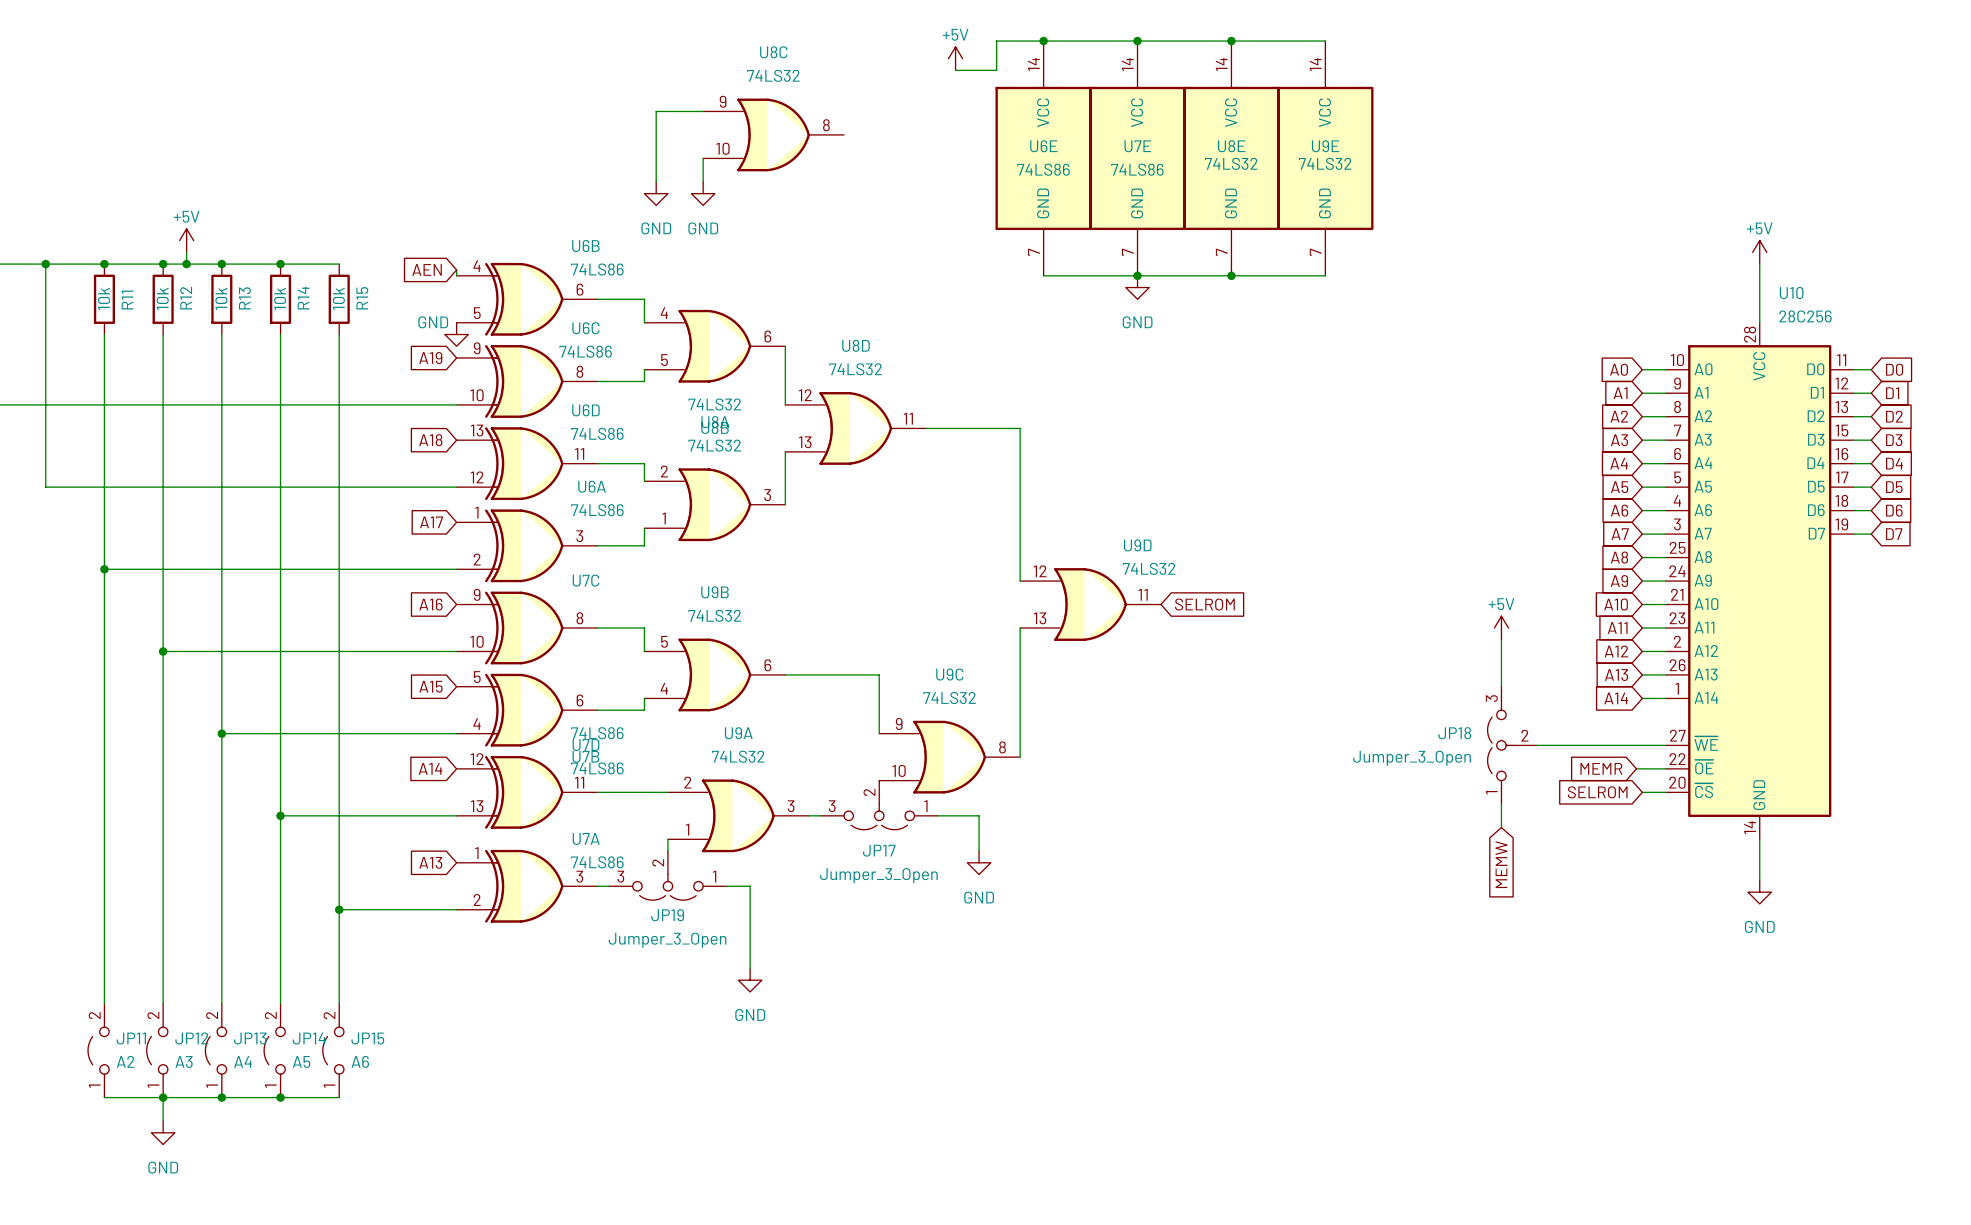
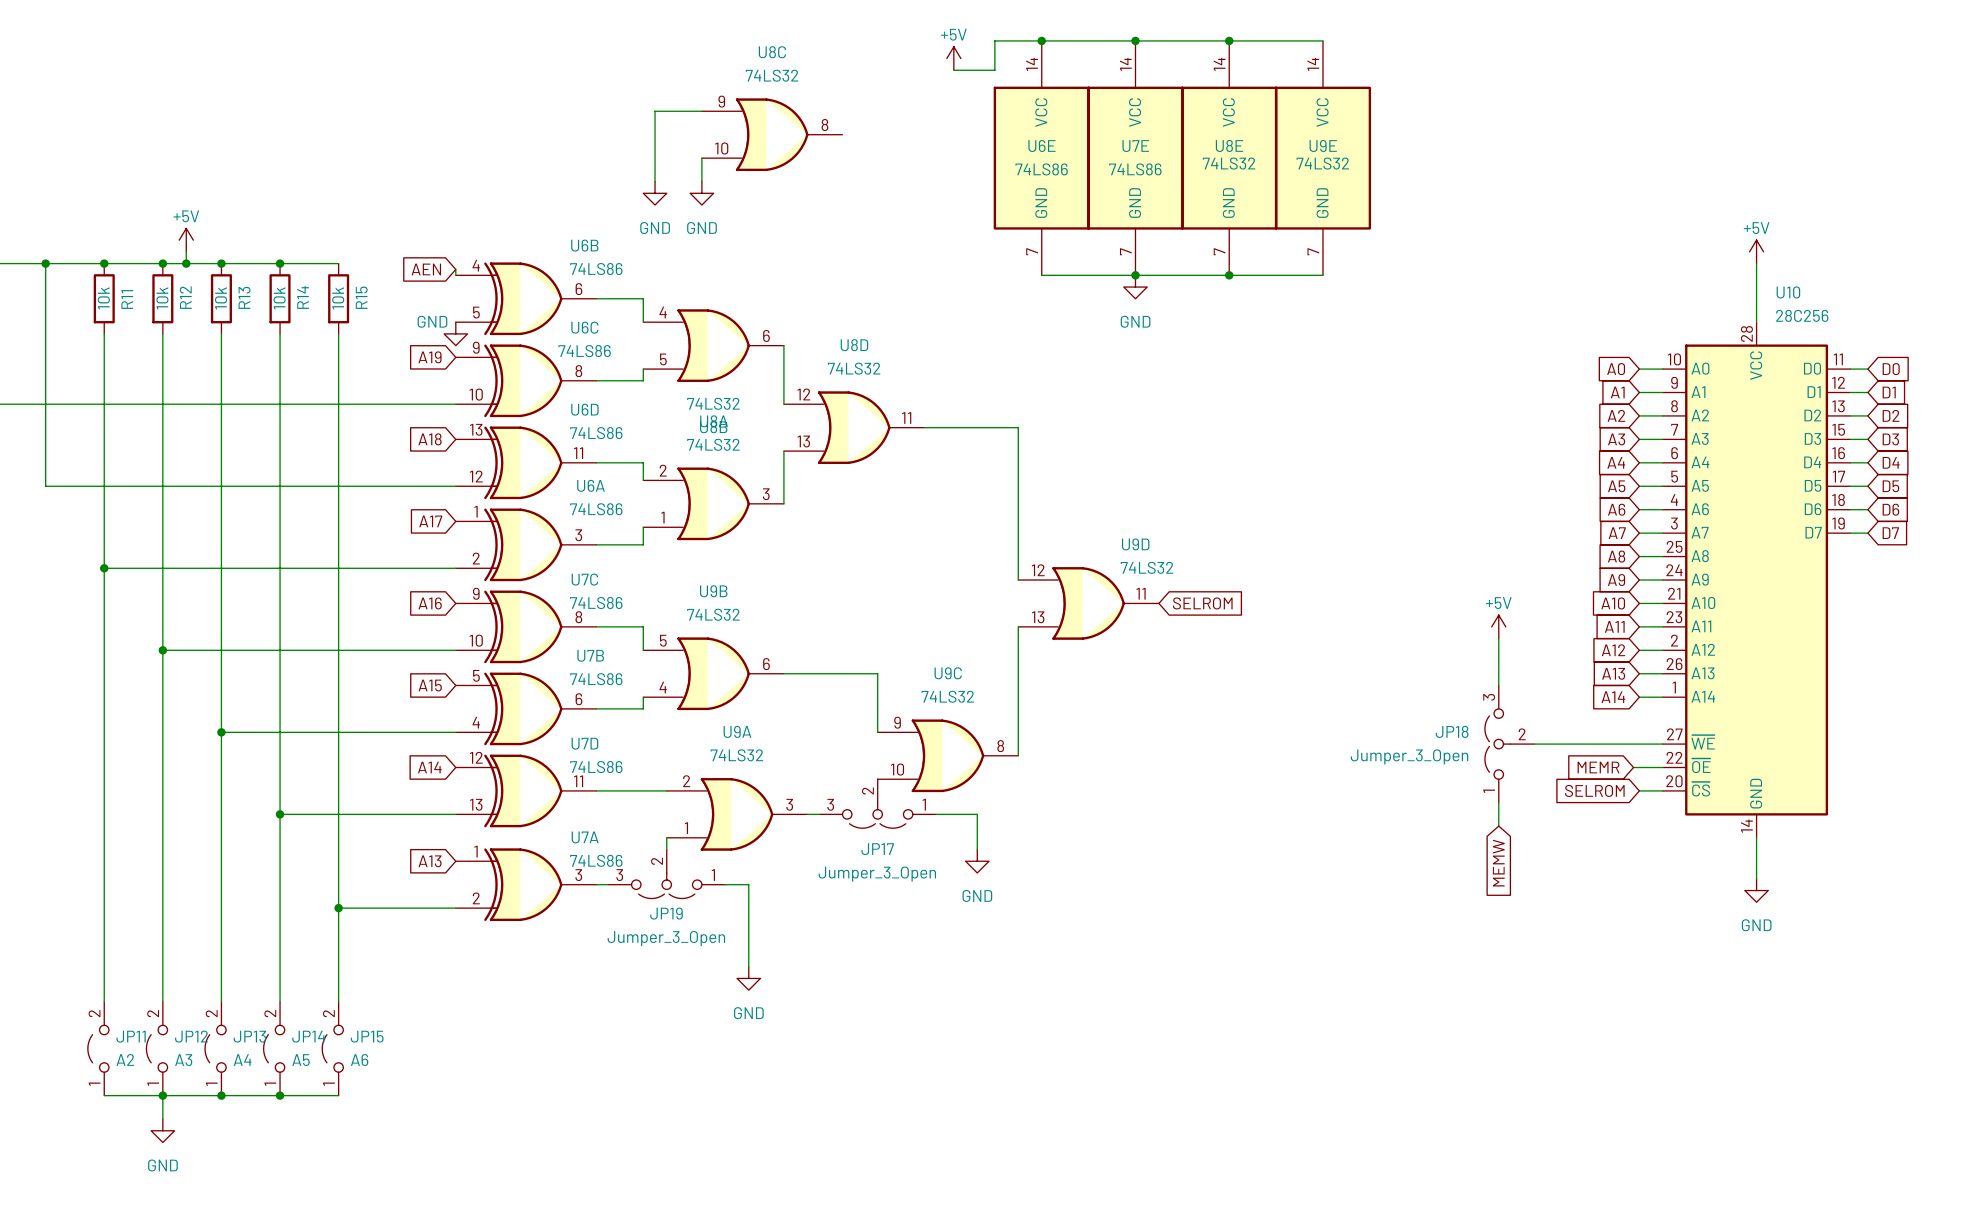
U7C value: none -> 74LS86 (596, 602)
U7B value position: 74LS86 (597, 733) -> 74LS86 (596, 679)
U7B name position: U7B (585, 756) -> U7B (590, 655)

